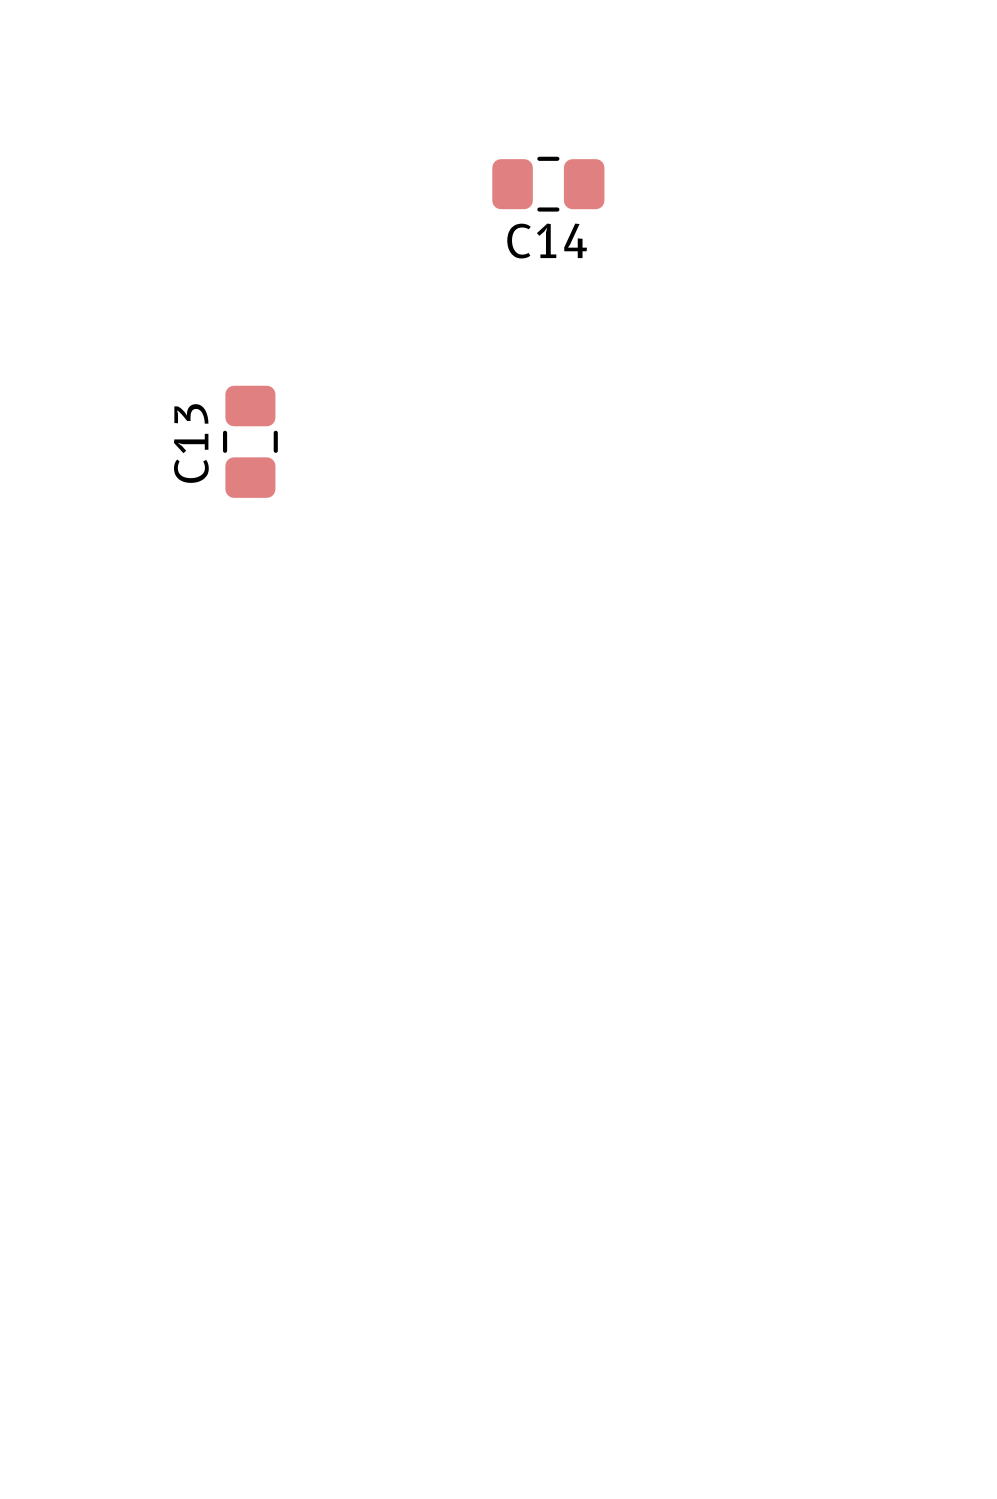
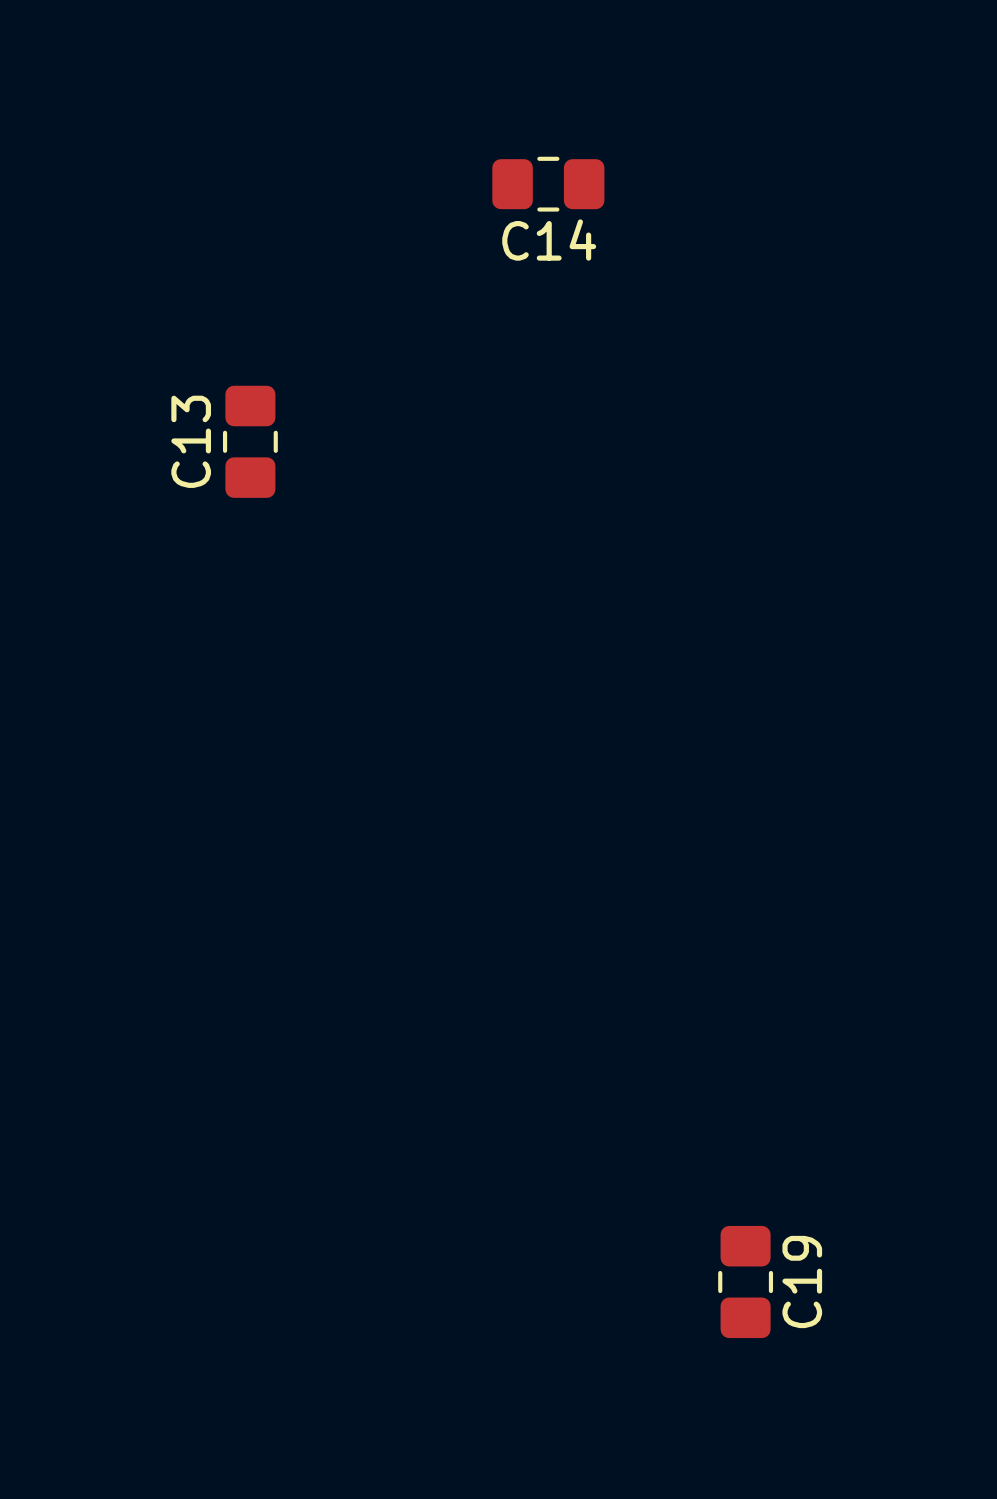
C19: none -> (745, 1282)

